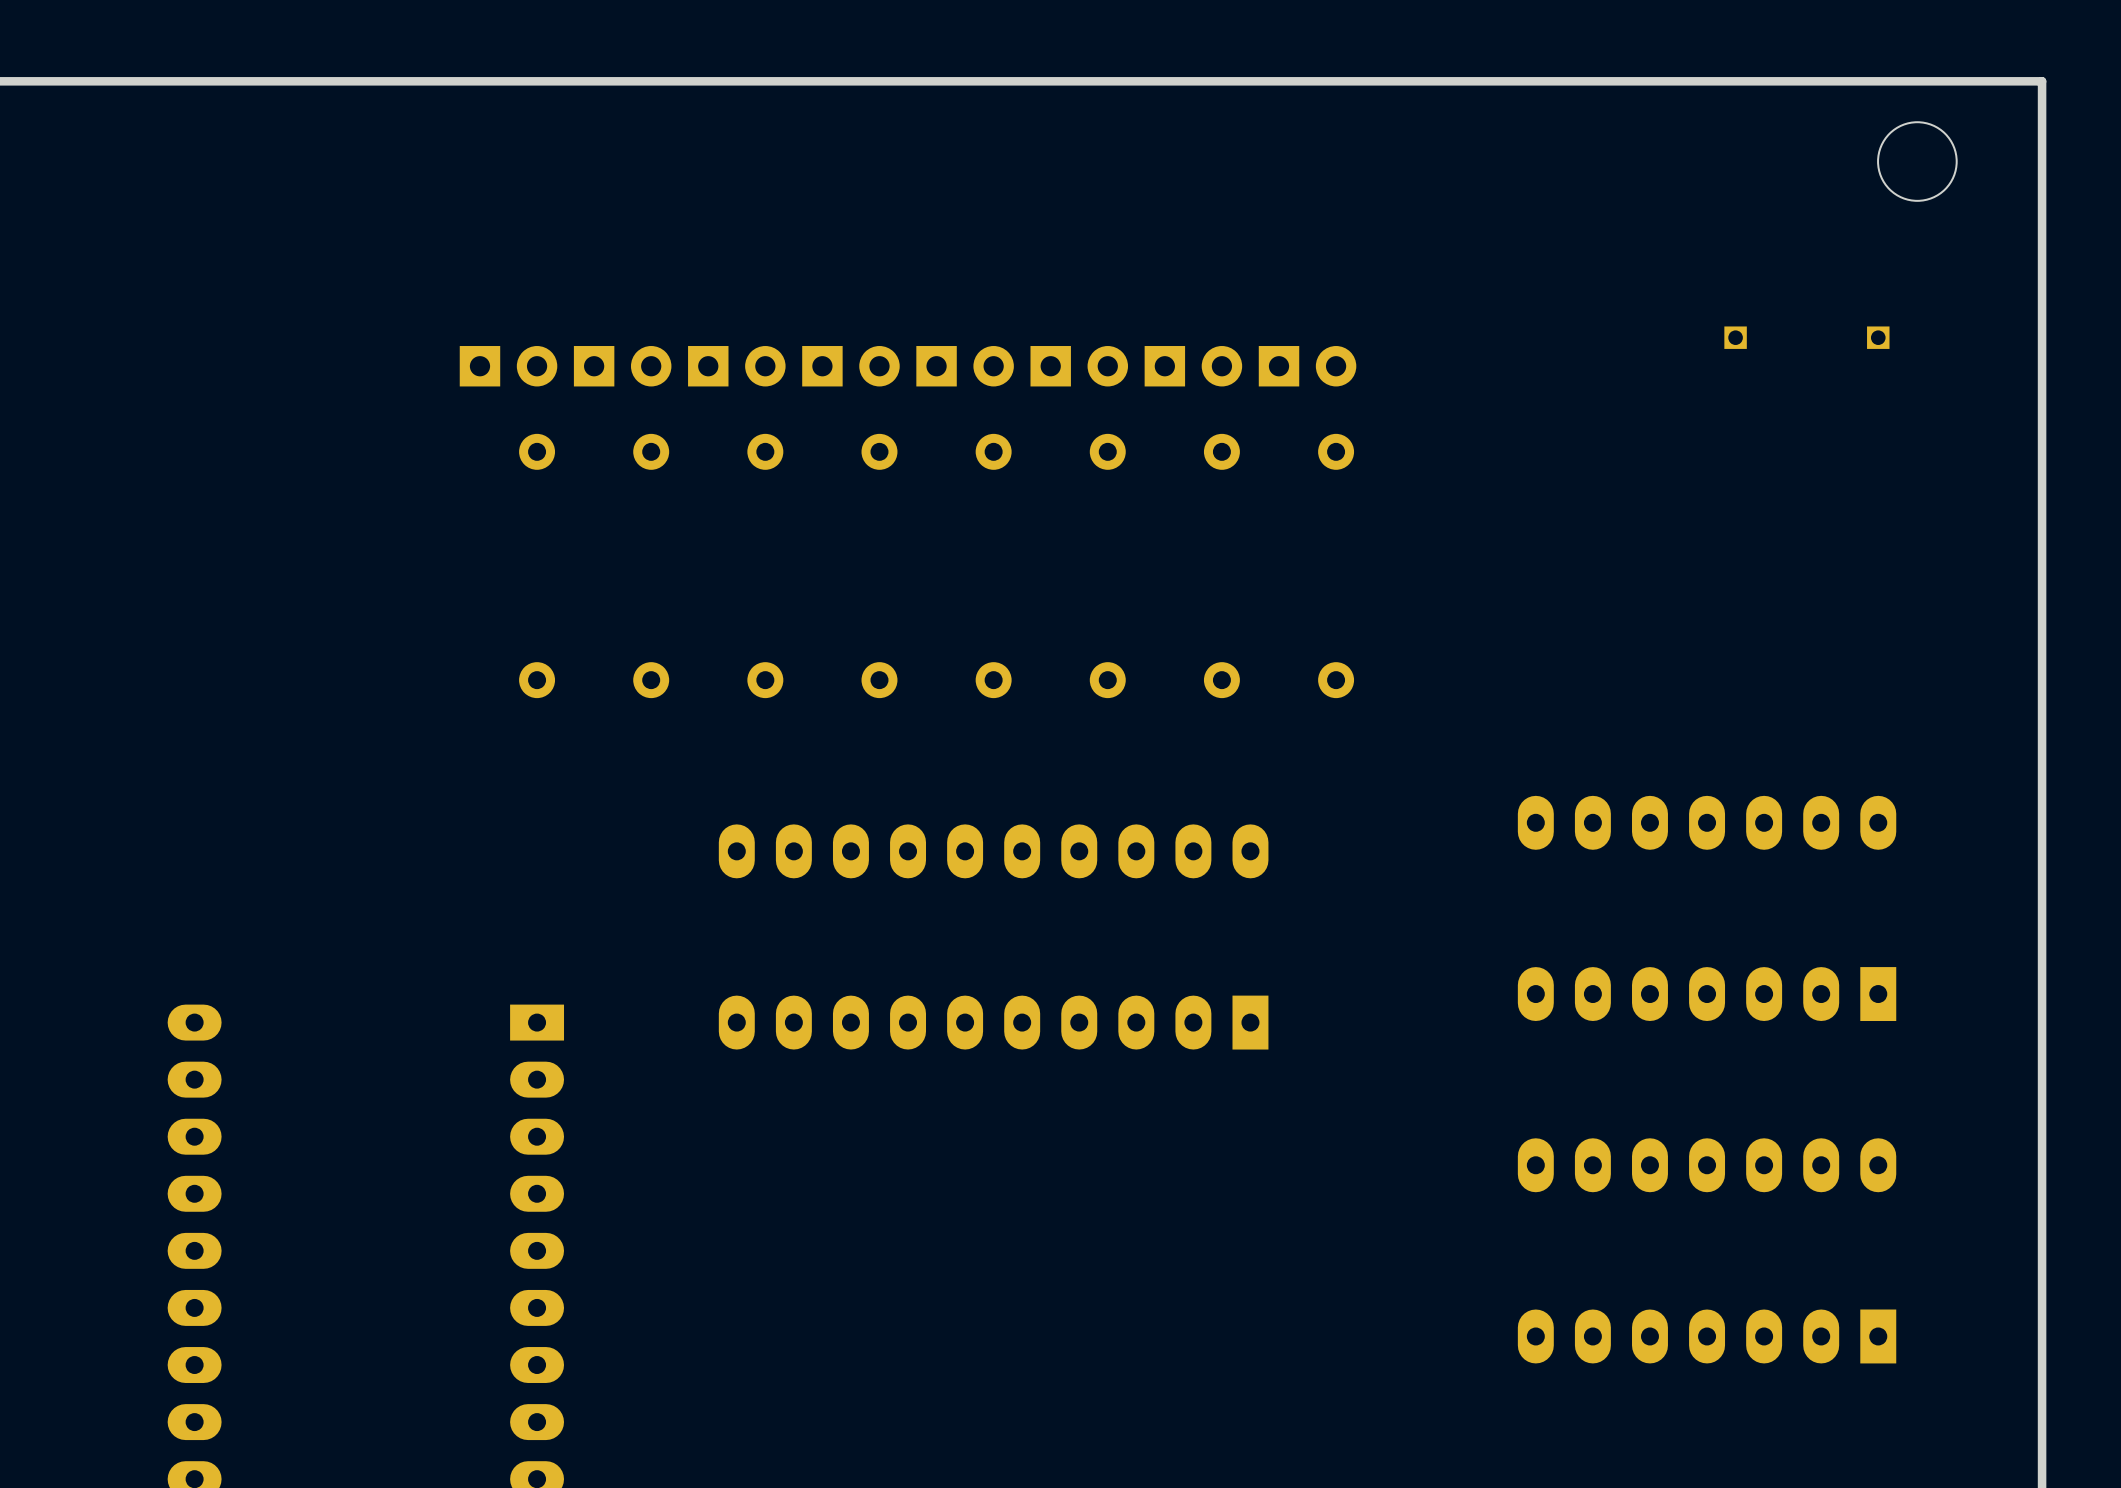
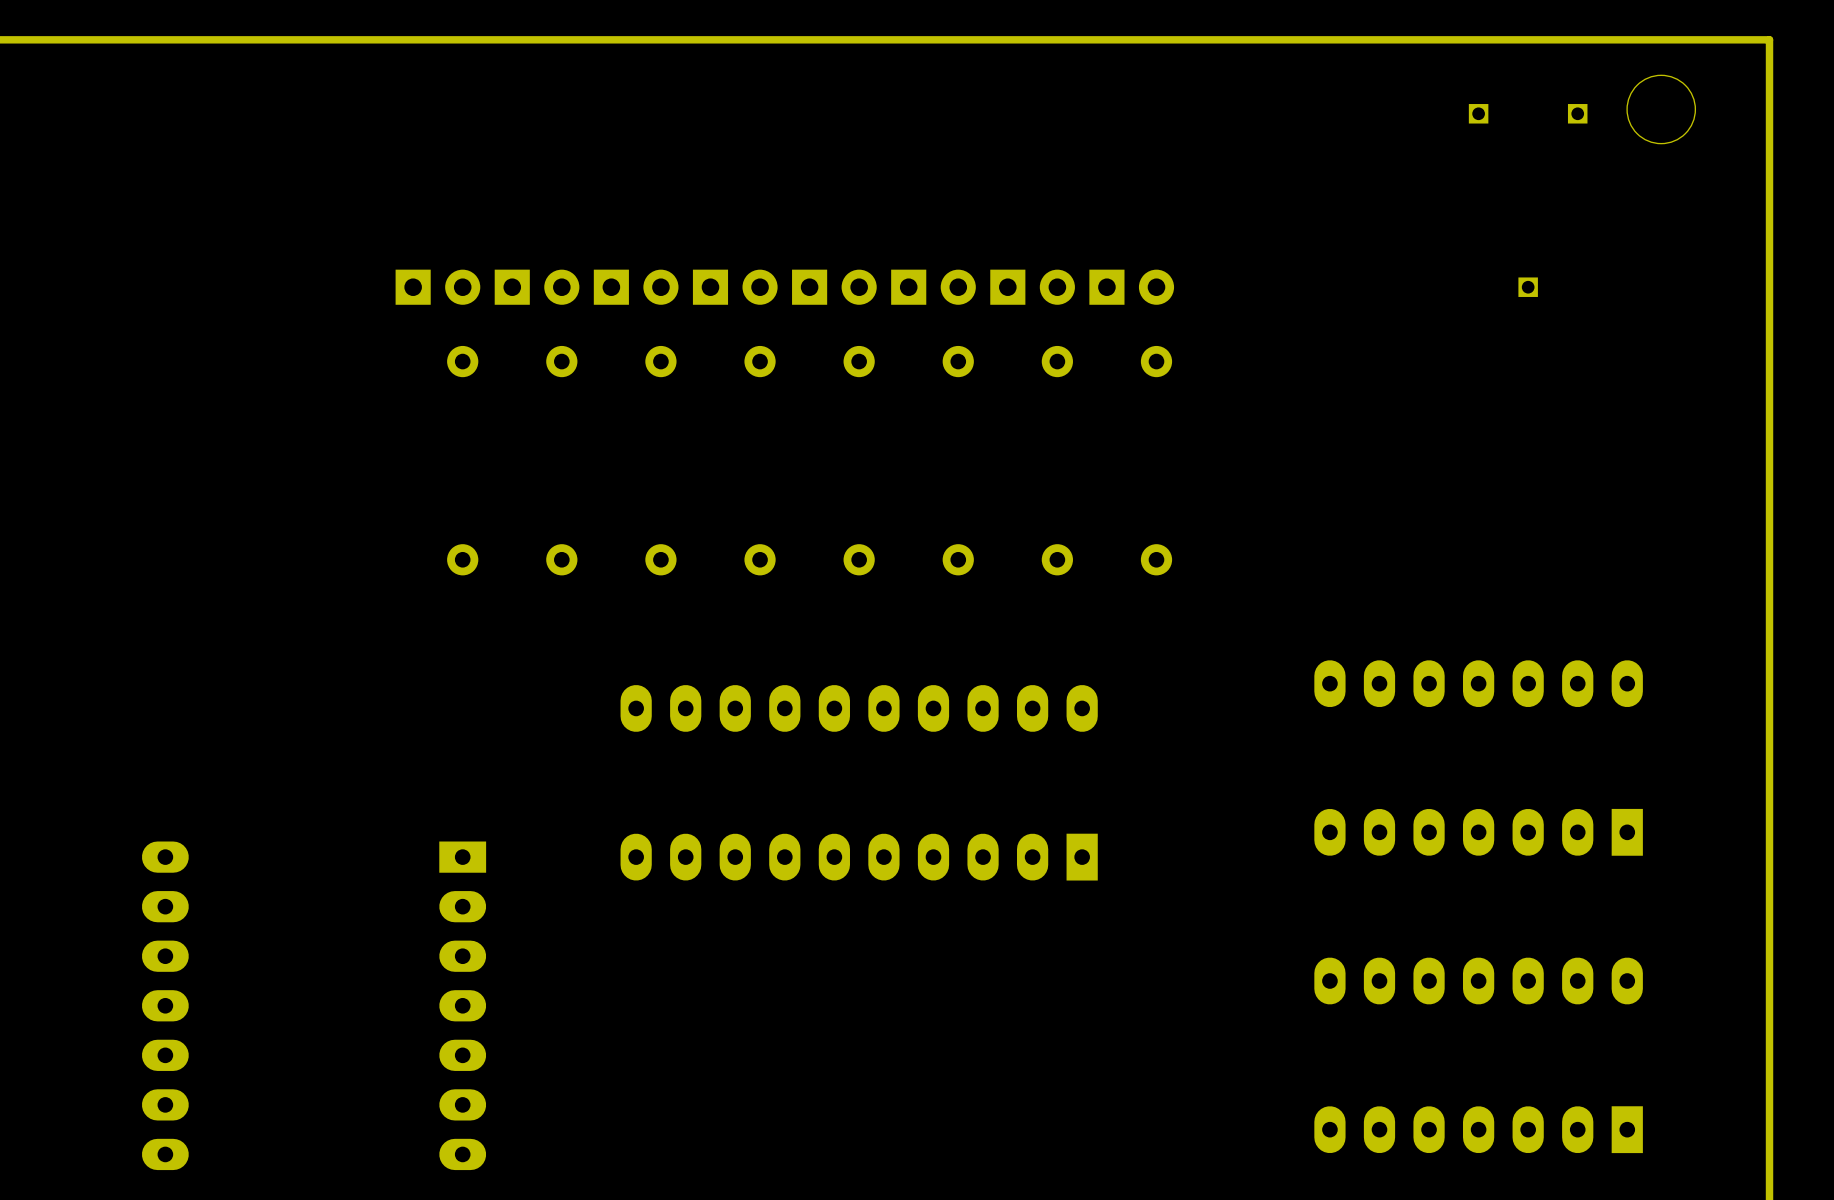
part: none -> (1478, 113)
part: none -> (1577, 113)
part position: (1735, 337) -> (1528, 287)
part: (1878, 337) -> none

